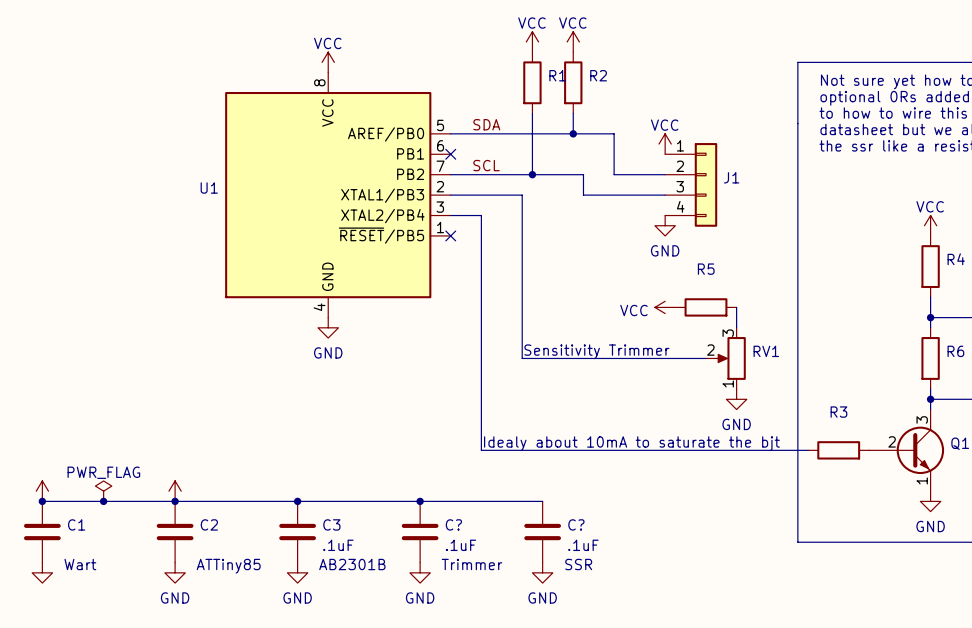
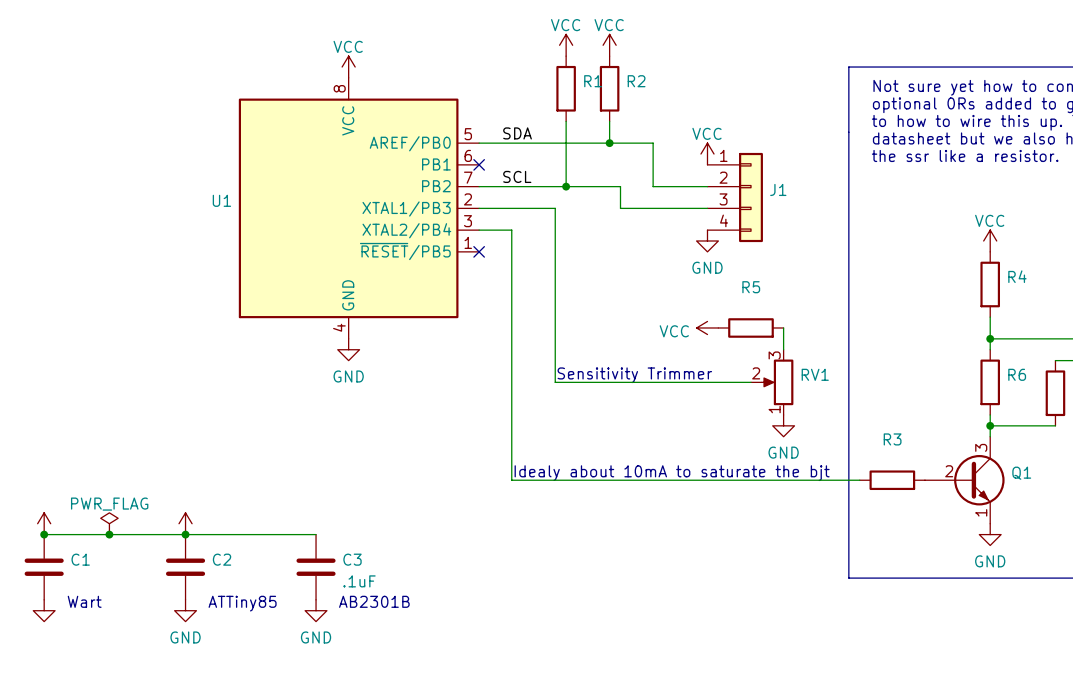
wire: (297, 501) (542, 501) -> none
junction: (297, 501) -> none
junction: (420, 501) -> none
C?: .1uF (420, 532) -> none
C?: .1uF (542, 532) -> none
text: Trimmer (471, 564) -> none
text: SSR (578, 564) -> none
power symbol: GND (420, 572) -> none
power symbol: GND (542, 572) -> none

